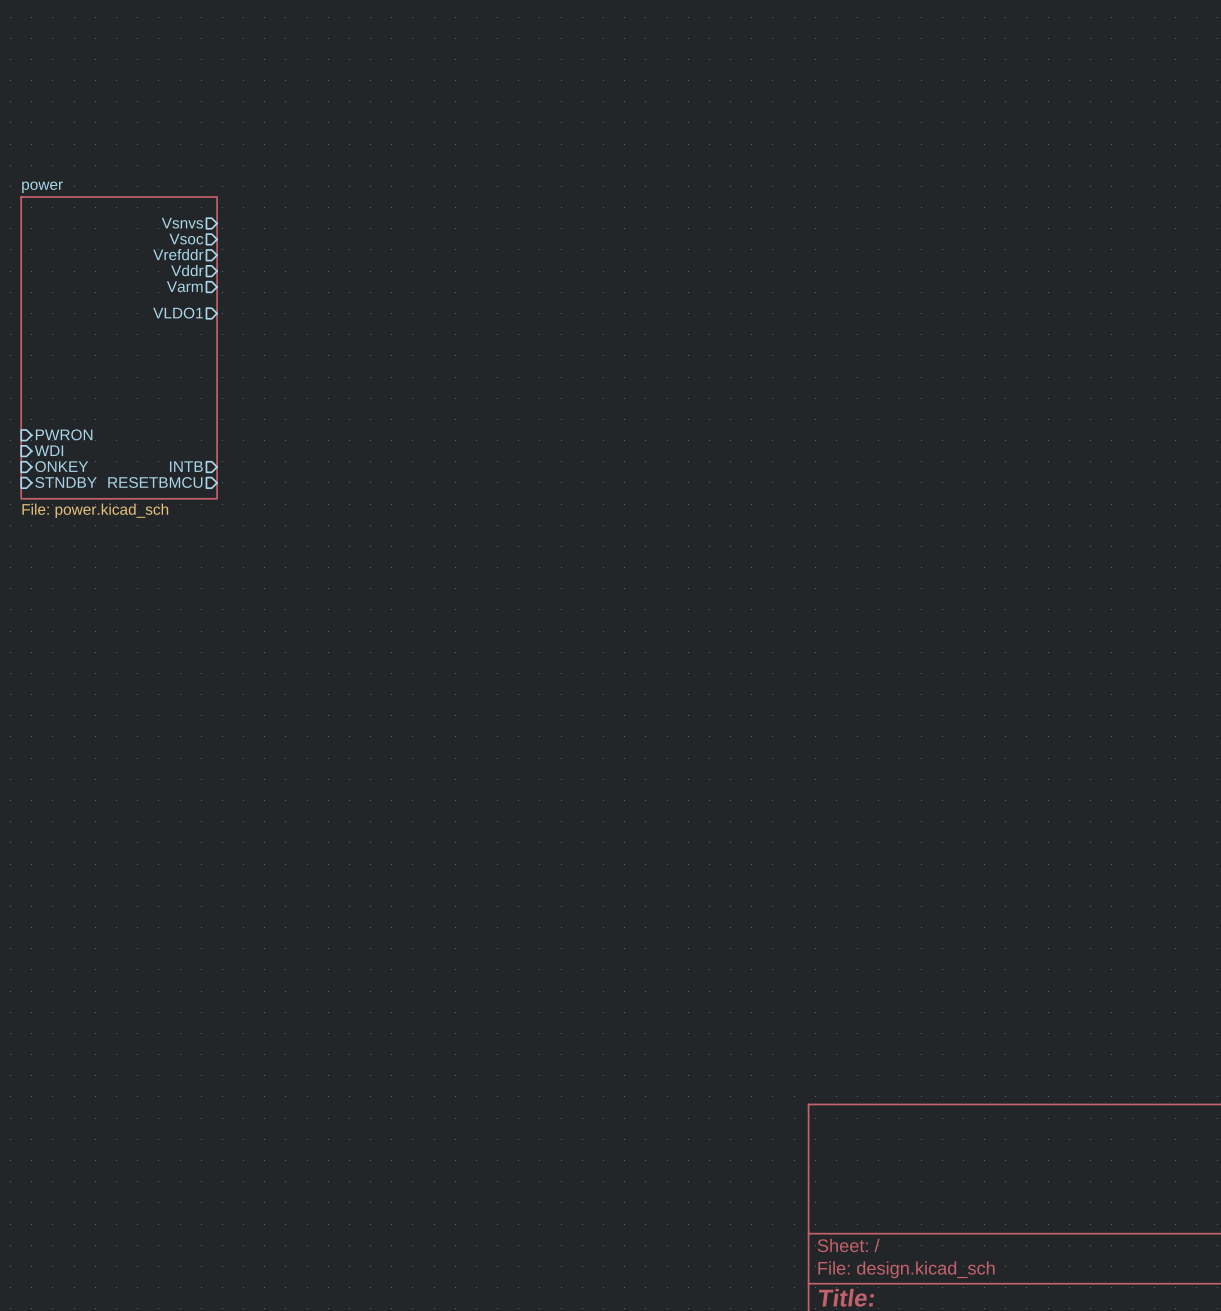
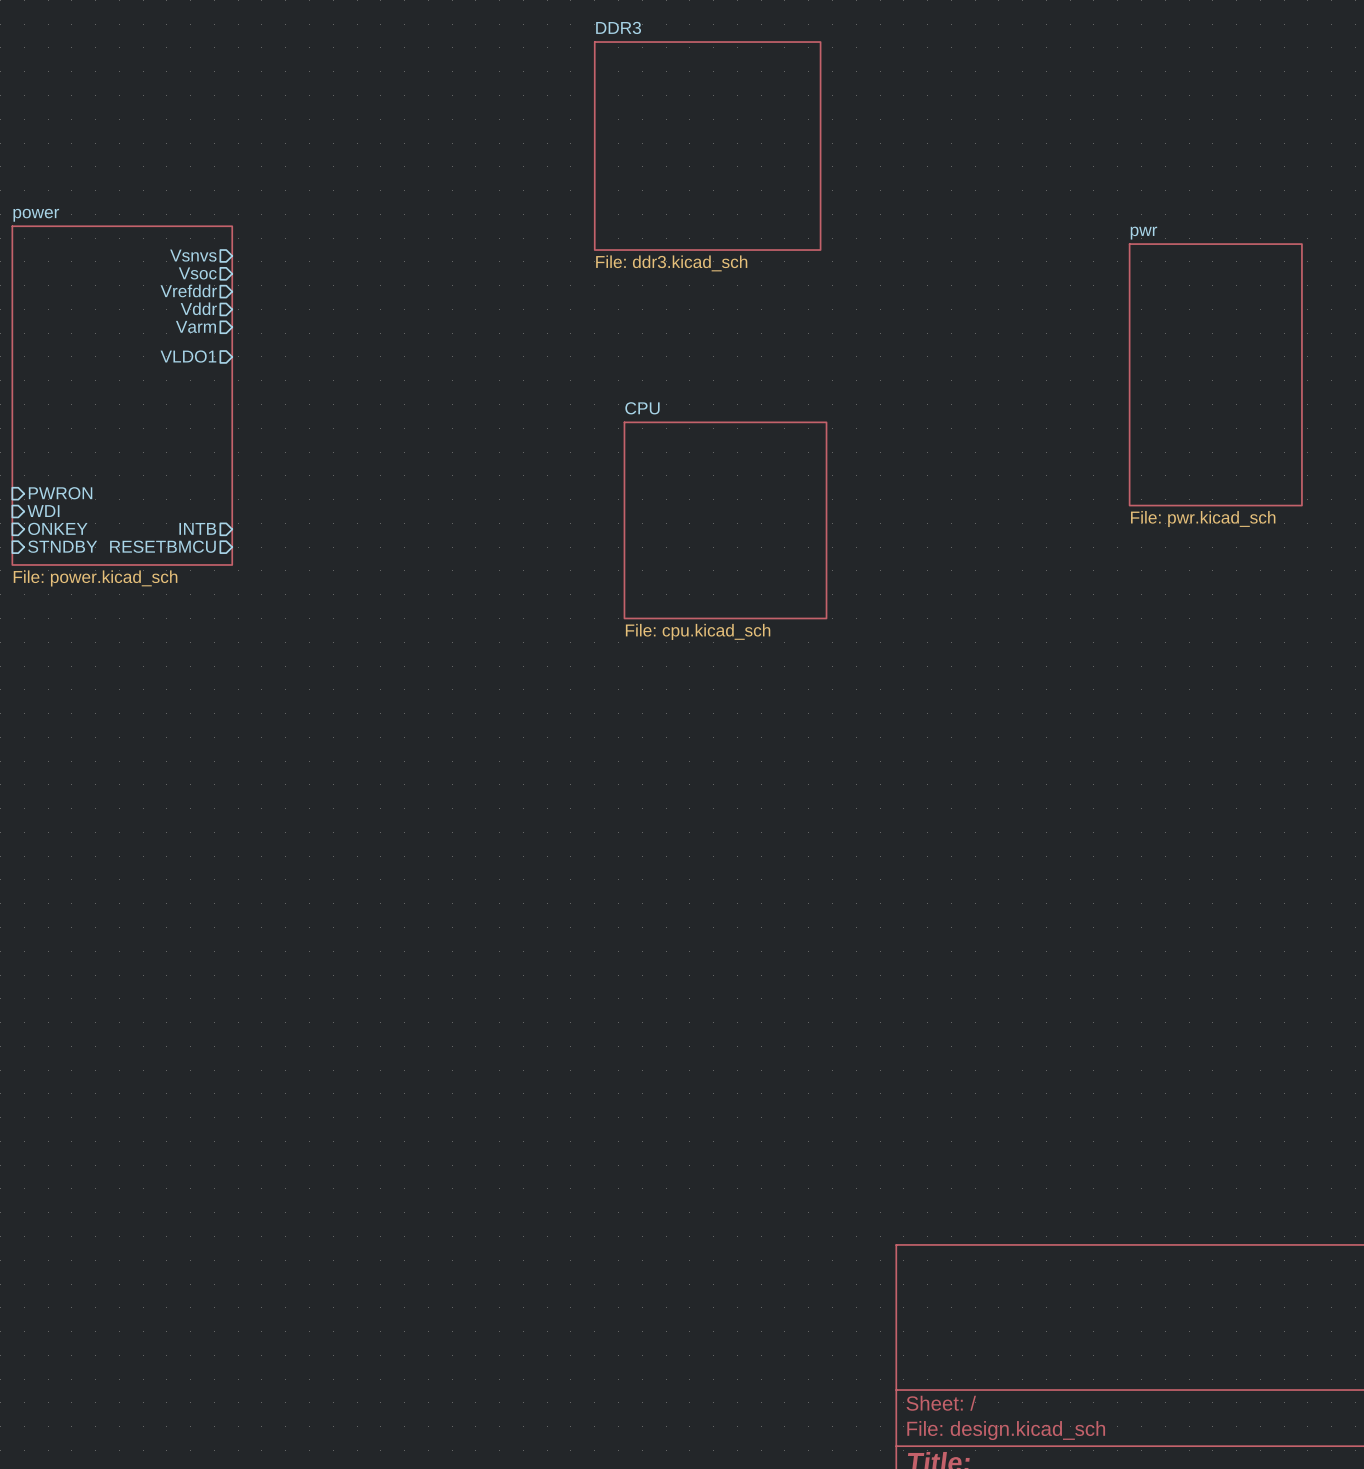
sheet DDR3: none -> File: ddr3.kicad_sch (707, 146)
sheet pwr: none -> File: pwr.kicad_sch (1215, 374)
sheet CPU: none -> File: cpu.kicad_sch (725, 520)

